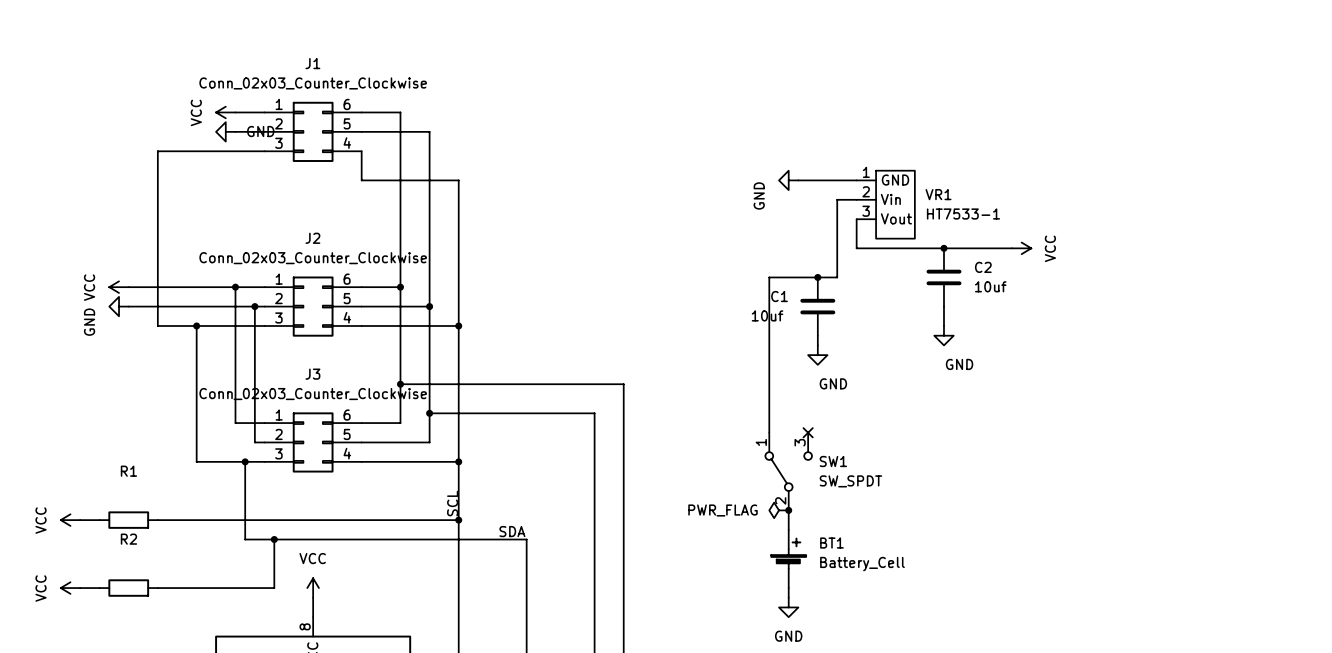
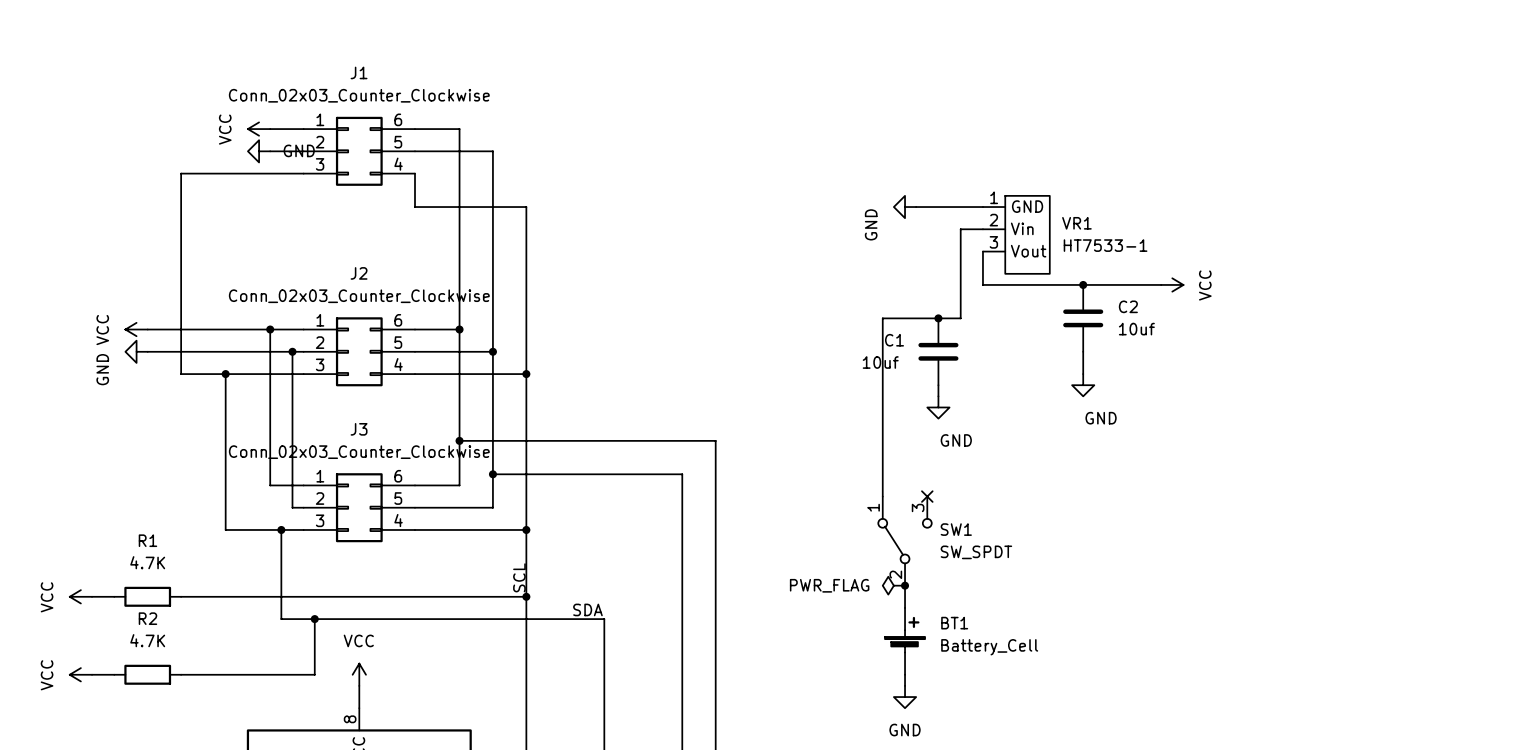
R1 value: none -> 4.7K (147, 562)
R2 value: none -> 4.7K (147, 640)

